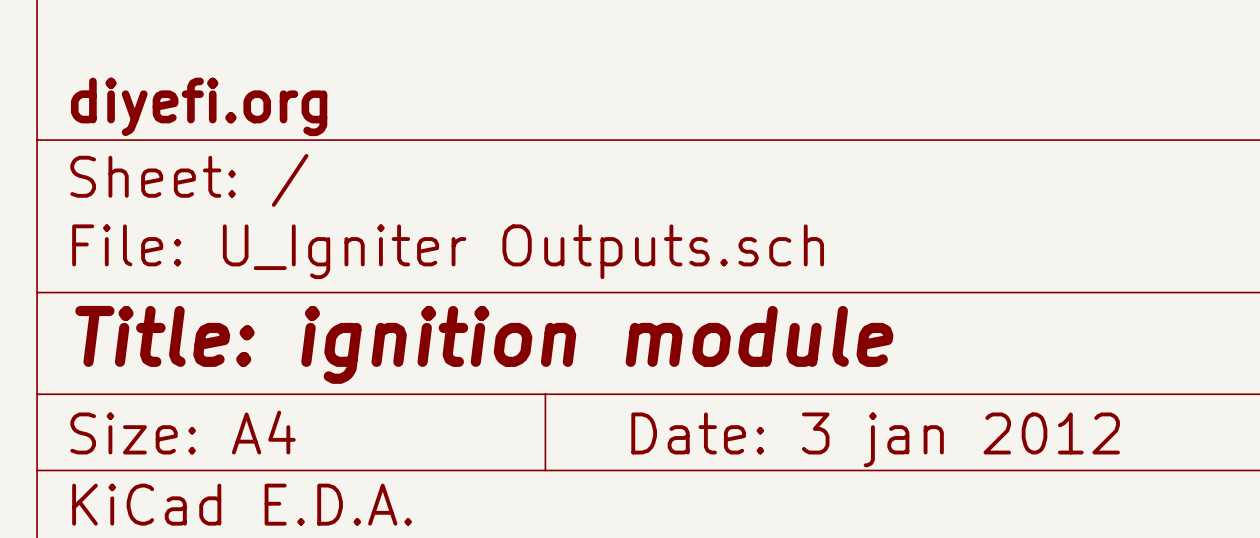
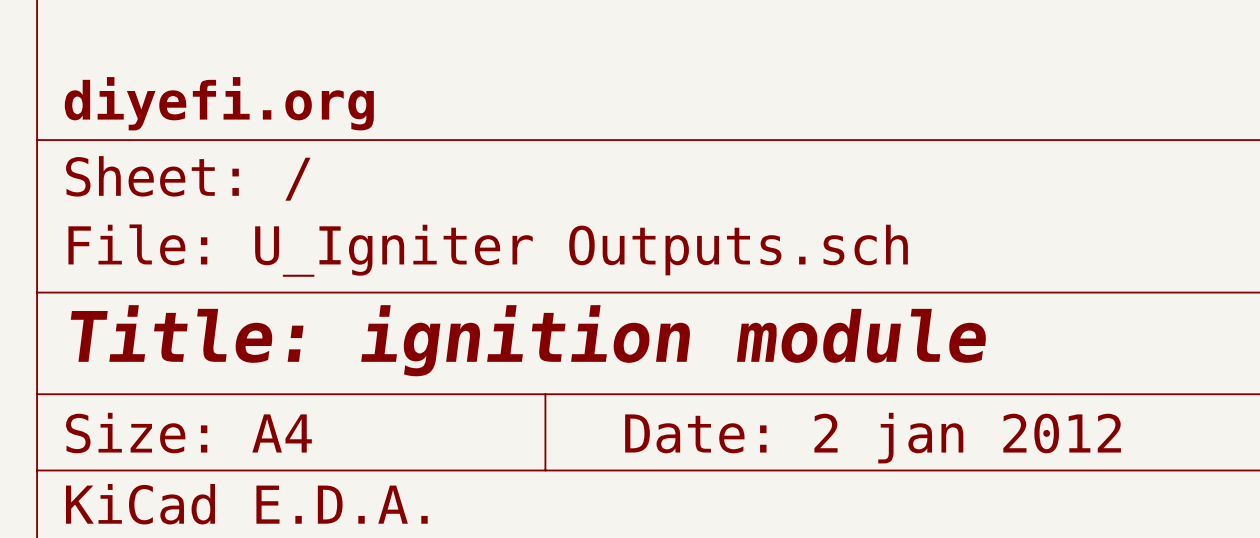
title block: Date: 3 jan 2012 (875, 439) -> Date: 2 jan 2012 (873, 438)

